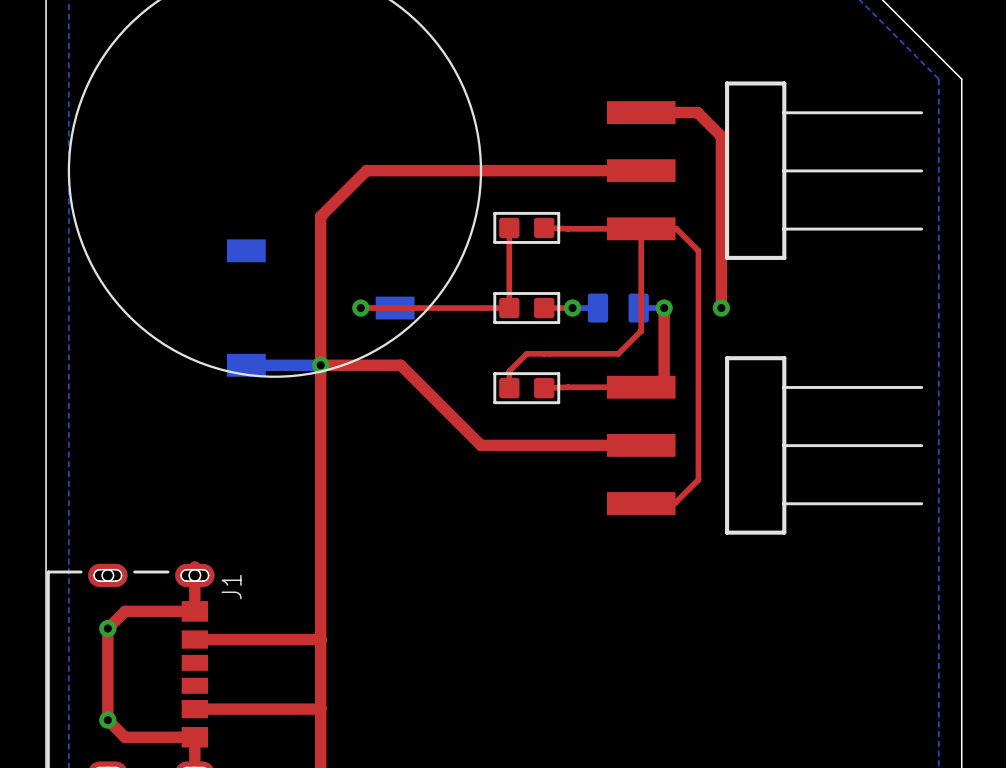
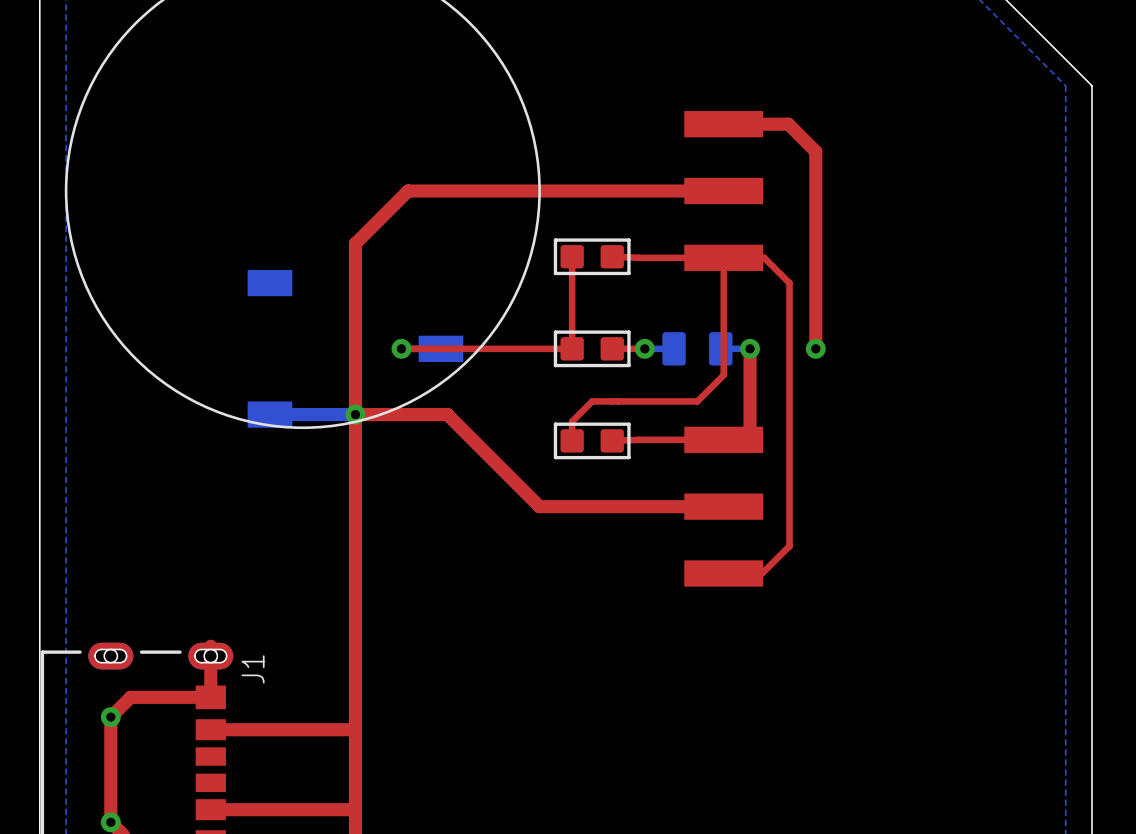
part: (765, 170) -> none
part: (765, 445) -> none

